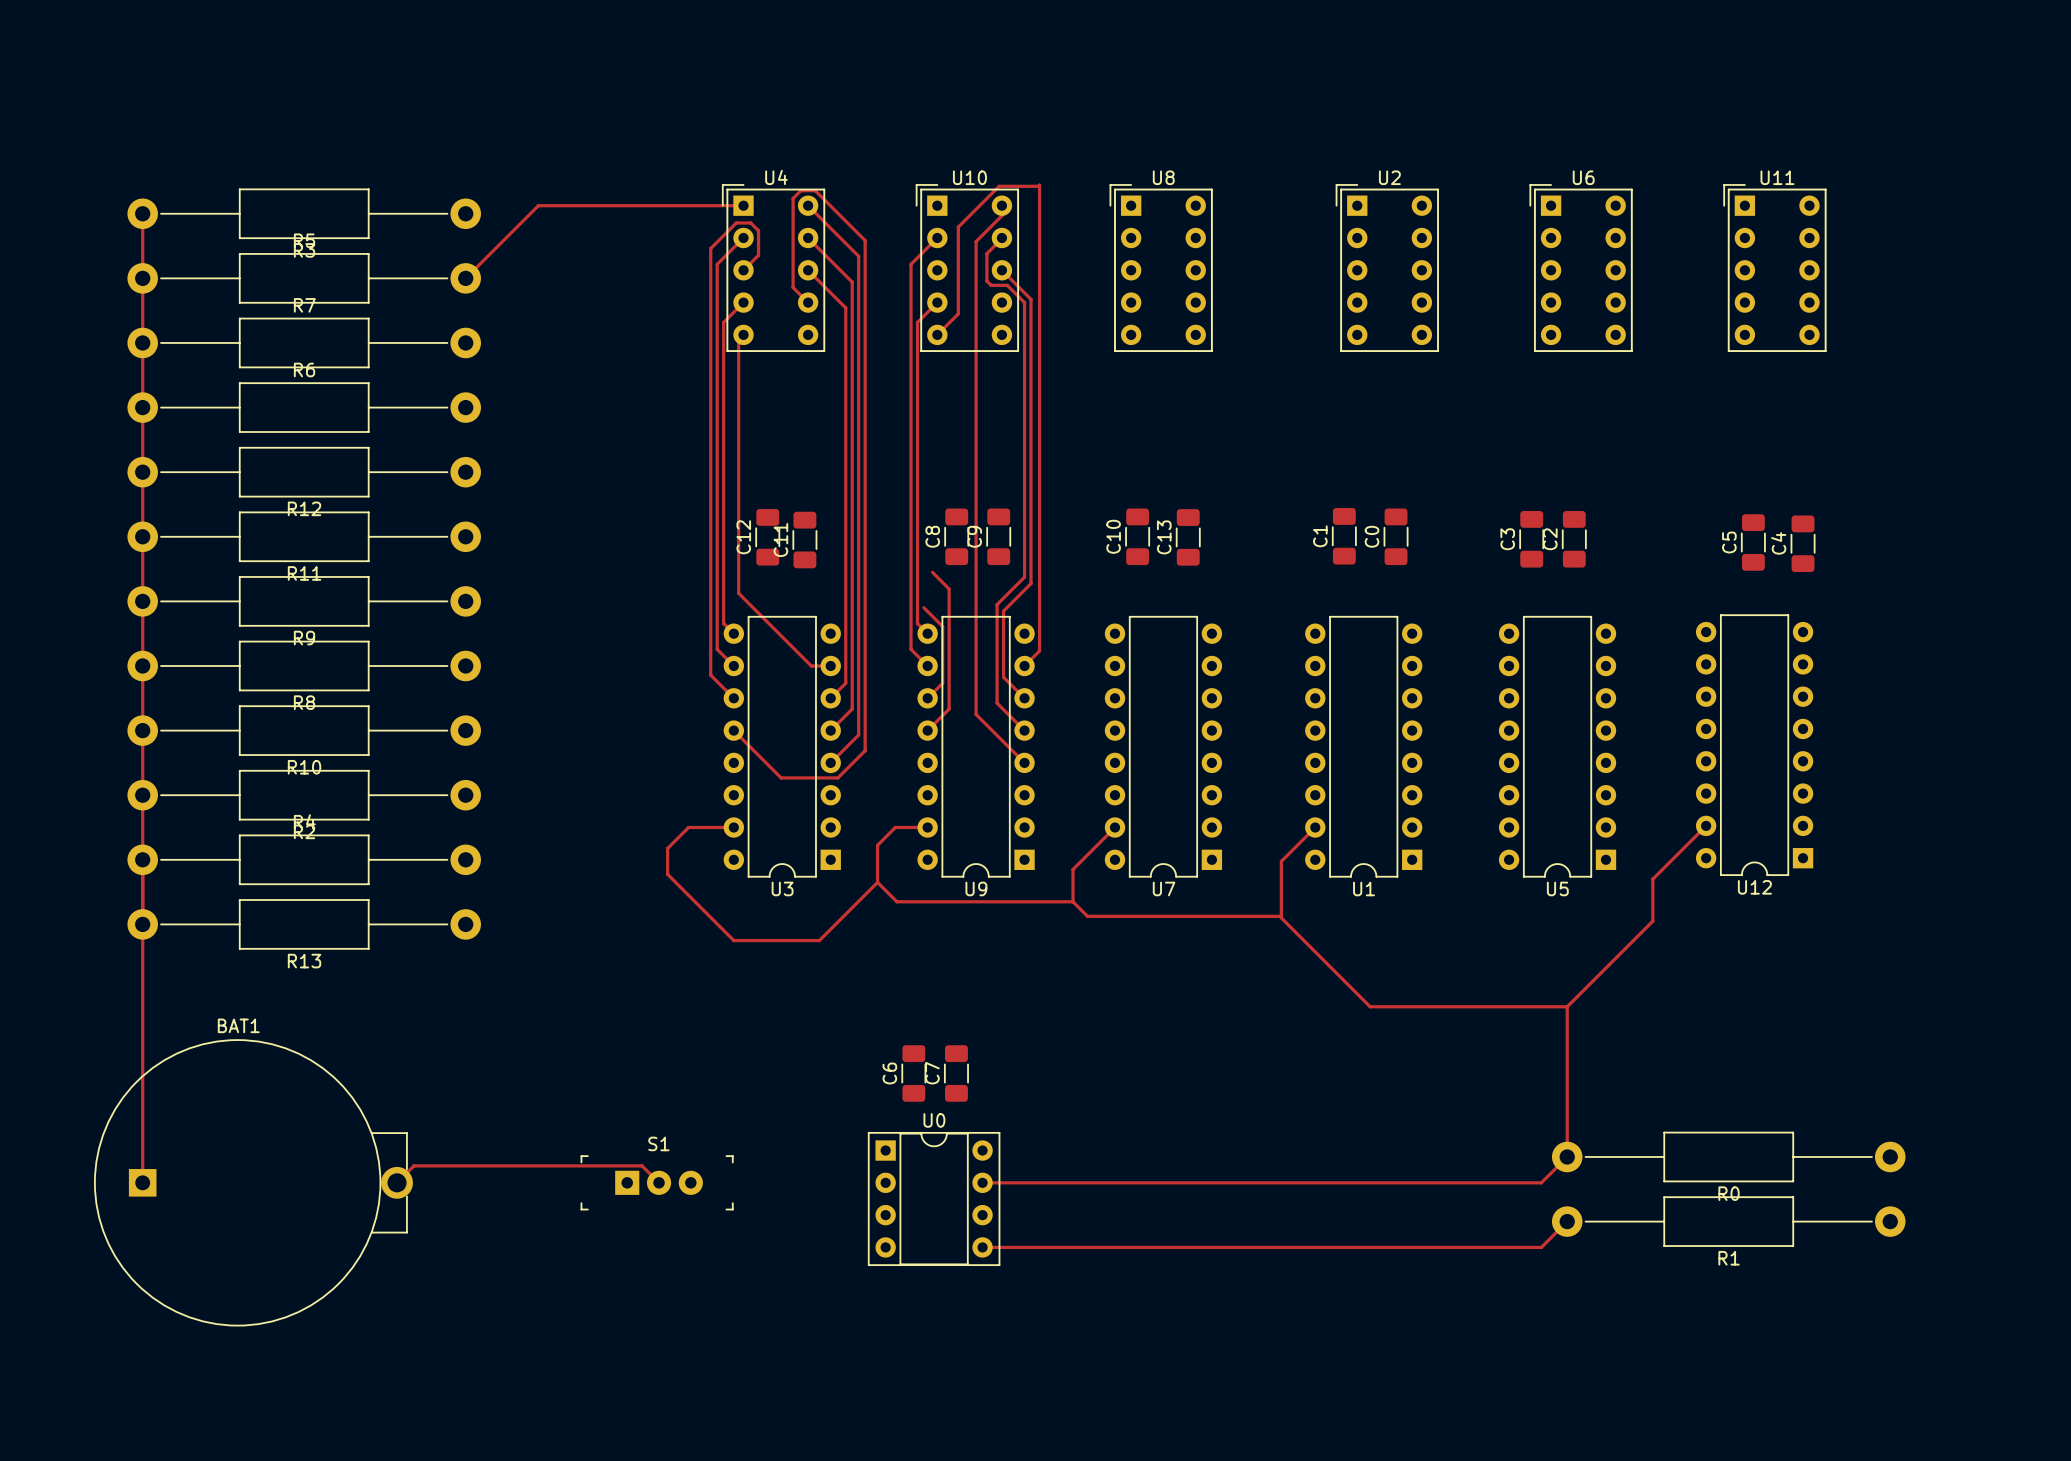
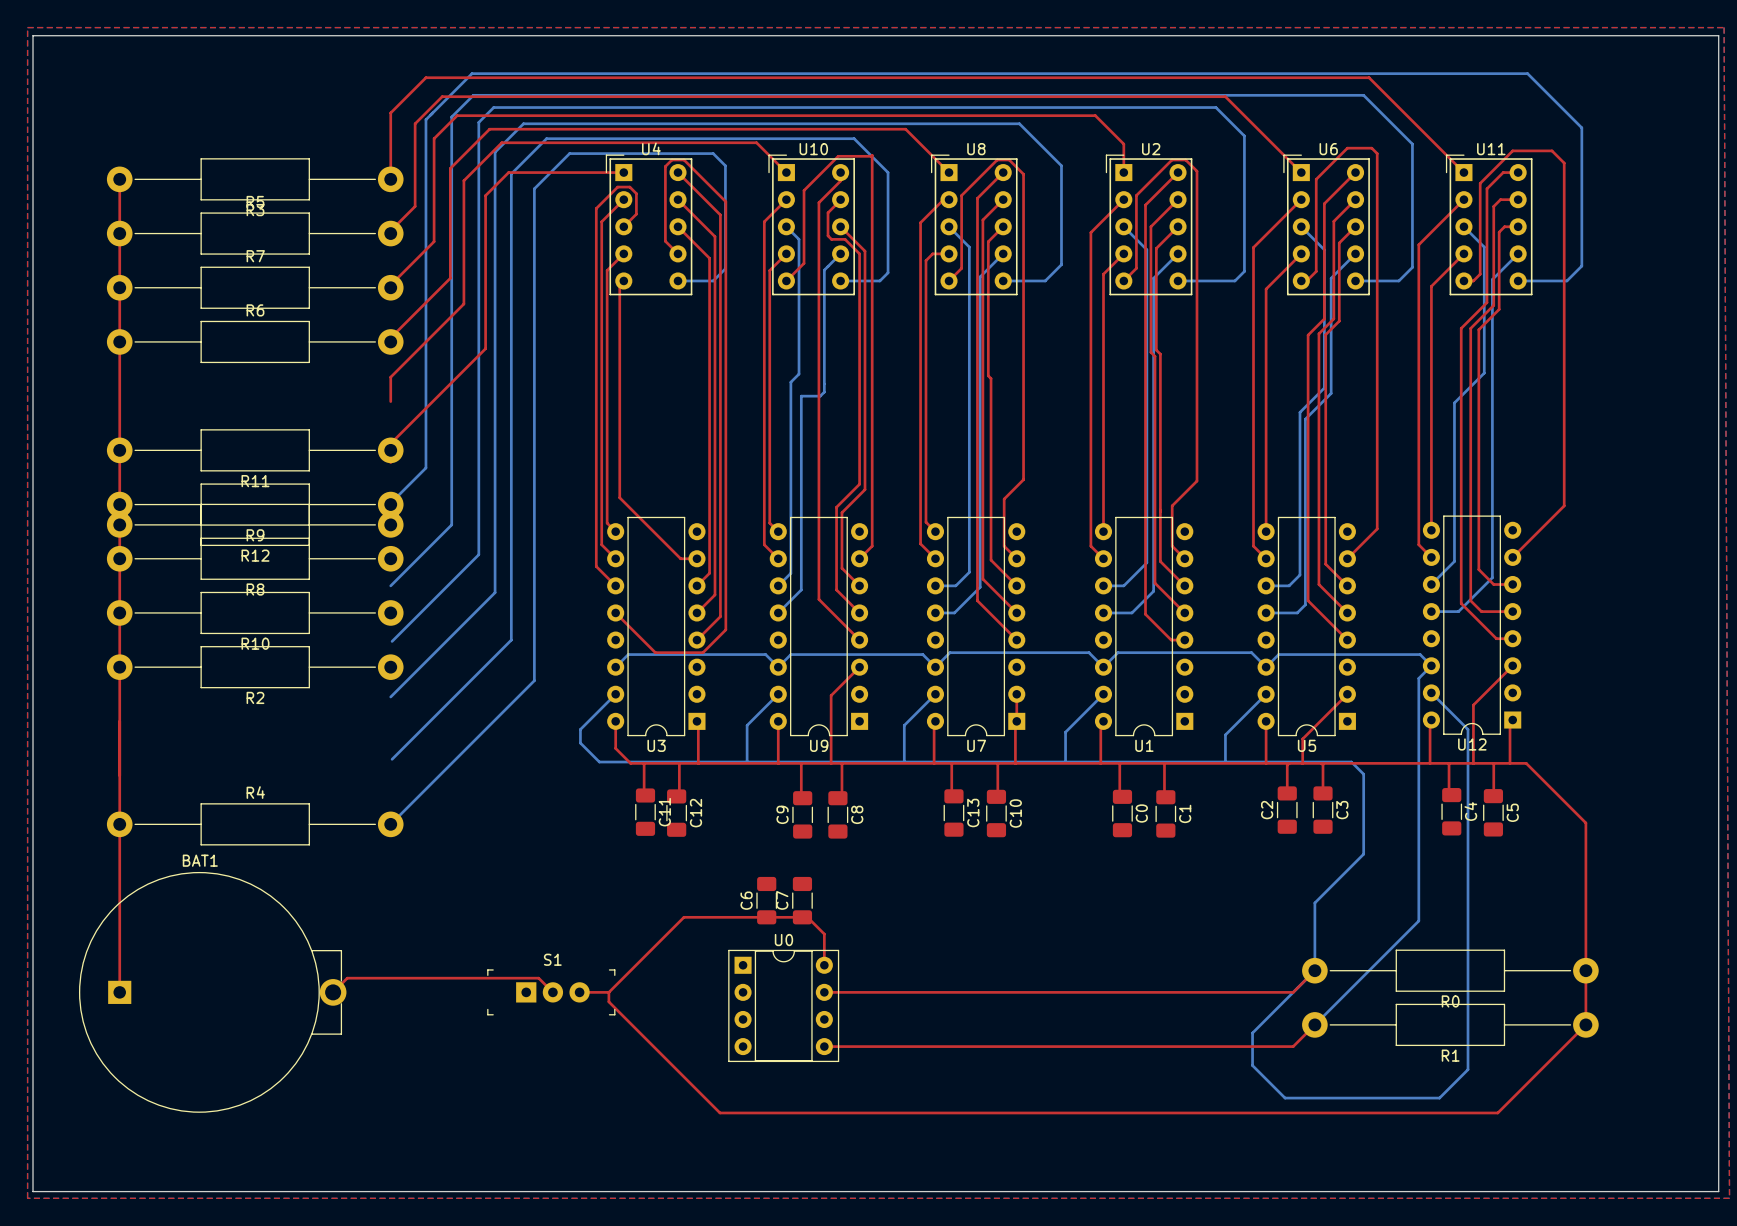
top zone outline: none -> (27, 27) (27, 1198) (1729, 1198) (1724, 27) (27, 27)
board edge: none -> (33, 35) (1718, 35) (1718, 1191) (33, 1191) (33, 35)
top track: (606, 205) (538, 205) (465, 278) -> (508, 172) (485, 195) (485, 348) (390, 443) (390, 462)
top track: none -> (786, 172) (756, 142) (501, 142) (463, 180) (463, 304) (390, 377) (390, 401)
top track: none -> (949, 172) (905, 129) (489, 129) (450, 168) (450, 278) (389, 339)
top track: none -> (1003, 172) (977, 198) (977, 600) (1016, 640)
top track: none -> (1123, 172) (1123, 144) (1095, 115) (457, 115) (434, 138) (434, 241) (390, 285)
top track: none -> (1178, 172) (1145, 205) (1145, 614) (1171, 640) (1184, 640)
top track: none -> (1301, 172) (1225, 96) (442, 96) (415, 123) (415, 206) (390, 230)
top track: none -> (1355, 172) (1324, 203) (1324, 318) (1308, 335) (1308, 600) (1347, 640)
top track: none -> (1463, 172) (1369, 77) (425, 77) (390, 112) (390, 177)
top track: none -> (1518, 172) (1503, 172) (1486, 188) (1486, 302) (1461, 328) (1461, 603) (1496, 638) (1512, 638)
top track: none -> (949, 199) (943, 199) (920, 222) (920, 543) (935, 558)
top track: none -> (1003, 199) (982, 220) (982, 579) (1016, 612)
top track: none -> (1123, 199) (1090, 232) (1090, 546) (1103, 558)
top track: none -> (1178, 199) (1150, 226) (1150, 352) (1154, 356) (1154, 583) (1184, 612)
top track: none -> (1301, 199) (1253, 247) (1253, 546) (1266, 558)
top track: none -> (1355, 199) (1333, 221) (1333, 318) (1318, 333) (1318, 584) (1347, 612)
top track: none -> (1463, 199) (1418, 244) (1418, 544) (1431, 557)
top track: none -> (1518, 199) (1500, 199) (1493, 206) (1493, 305) (1470, 328) (1470, 600) (1481, 611) (1512, 611)
U2 position: (1387, 268) -> (1149, 224)
bottom track: none -> (786, 226) (799, 239) (799, 374) (790, 382) (790, 573) (778, 585)
bottom track: none -> (949, 226) (969, 247) (969, 572) (955, 585) (935, 585)
top track: none -> (1003, 226) (988, 241) (988, 375) (991, 378) (991, 560) (1016, 585)
bottom track: none -> (1123, 226) (1146, 249) (1146, 562) (1123, 585) (1103, 585)
top track: none -> (1178, 226) (1156, 248) (1156, 350) (1160, 354) (1160, 561) (1184, 585)
bottom track: none -> (1301, 226) (1324, 249) (1324, 388) (1299, 412) (1299, 575) (1289, 585) (1266, 585)
top track: none -> (1355, 226) (1339, 243) (1339, 321) (1325, 334) (1325, 564) (1347, 585)
bottom track: none -> (1463, 226) (1484, 247) (1484, 373) (1454, 402) (1454, 561) (1431, 584)
top track: none -> (1518, 226) (1504, 226) (1499, 232) (1499, 309) (1478, 329) (1478, 569) (1493, 584) (1512, 584)
bottom track: none -> (840, 253) (824, 270) (824, 392) (820, 396) (801, 396) (801, 589) (778, 612)
top track: none -> (949, 253) (932, 253) (925, 260) (925, 522) (935, 531)
bottom track: none -> (1003, 253) (980, 276) (980, 587) (954, 612) (935, 612)
top track: none -> (1123, 253) (1103, 274) (1103, 531)
bottom track: none -> (1178, 253) (1153, 278) (1153, 591) (1131, 612) (1103, 612)
top track: none -> (1301, 253) (1266, 289) (1266, 531)
bottom track: none -> (1355, 253) (1331, 278) (1331, 393) (1305, 419) (1305, 604) (1297, 612) (1266, 612)
top track: none -> (1463, 253) (1431, 286) (1431, 530)
bottom track: none -> (1518, 253) (1492, 279) (1492, 577) (1458, 611) (1431, 611)
bottom track: none -> (678, 280) (713, 280) (725, 268) (725, 165) (713, 153) (569, 153) (534, 188) (534, 680) (390, 824)
bottom track: none -> (840, 280) (879, 280) (888, 272) (888, 172) (854, 138) (546, 138) (511, 173) (511, 640) (392, 759)
top track: none -> (949, 280) (961, 268) (961, 195) (997, 159) (1009, 159) (1023, 174) (1023, 479) (1004, 499) (1004, 546) (1016, 558)
bottom track: none -> (1003, 280) (1045, 280) (1061, 264) (1061, 165) (1019, 123) (523, 123) (495, 152) (495, 592) (390, 696)
top track: none -> (1123, 280) (1136, 268) (1136, 195) (1171, 159) (1185, 159) (1196, 171) (1196, 481) (1172, 505) (1172, 546) (1184, 558)
bottom track: none -> (1178, 280) (1234, 280) (1244, 271) (1244, 135) (1215, 107) (493, 107) (478, 122) (478, 554) (392, 641)
top track: none -> (1301, 280) (1306, 280) (1316, 271) (1316, 179) (1347, 148) (1371, 148) (1377, 153) (1377, 528) (1347, 558)
bottom track: none -> (1355, 280) (1398, 280) (1412, 267) (1412, 144) (1363, 95) (473, 95) (451, 117) (451, 524) (390, 585)
top track: none -> (1463, 280) (1473, 280) (1480, 274) (1480, 183) (1512, 150) (1552, 150) (1564, 163) (1564, 505) (1512, 557)
bottom track: none -> (1518, 280) (1566, 280) (1581, 266) (1581, 127) (1527, 73) (472, 73) (425, 119) (425, 467) (390, 503) (390, 524)
R12 position: (304, 472) -> (255, 524)
C8 name position: C8 (932, 536) -> C8 (857, 814)
C8 position: (956, 536) -> (837, 814)
C9 position: (998, 536) -> (802, 814)
C10 name position: C10 (1113, 536) -> C10 (1015, 813)
C10 position: (1137, 536) -> (996, 813)
C1 name position: C1 (1320, 536) -> C1 (1185, 813)
C1 position: (1344, 536) -> (1165, 813)
C0 name position: C0 (1372, 536) -> C0 (1141, 813)
C0 position: (1396, 536) -> (1122, 813)
C12 name position: C12 (743, 537) -> C12 (695, 813)
C12 position: (767, 537) -> (676, 813)
C13 name position: C13 (1164, 537) -> C13 (973, 812)
C13 position: (1188, 537) -> (953, 812)
C3 name position: C3 (1507, 539) -> C3 (1342, 810)
C3 position: (1531, 539) -> (1323, 810)
C2 position: (1574, 539) -> (1287, 810)
C11 name position: C11 (780, 540) -> C11 (664, 812)
C11 position: (804, 540) -> (645, 812)
C5 name position: C5 (1729, 542) -> C5 (1512, 812)
C5 position: (1753, 542) -> (1493, 812)
C4 name position: C4 (1778, 543) -> C4 (1470, 811)
C4 position: (1803, 543) -> (1451, 811)
top track: (932, 572) (949, 588) (949, 709) (927, 730) -> none
top track: (923, 607) (942, 626) (942, 683) (927, 698) -> none
top track: none -> (1512, 665) (1473, 705) (1473, 763)
bottom track: none -> (615, 667) (628, 654) (765, 654) (778, 667) (790, 654) (922, 654) (935, 667) (949, 652) (1088, 652) (1103, 667) (1117, 652) (1251, 652) (1266, 667) (1278, 654) (1420, 654) (1431, 665) (1418, 678) (1418, 920) (1314, 1024)
top track: none -> (859, 667) (831, 695) (831, 763)
top track: (1706, 825) (1652, 879) (1652, 921) (1567, 1006) -> none
bottom track: none -> (1431, 692) (1468, 729) (1468, 1069) (1439, 1098) (1285, 1098) (1252, 1065) (1252, 1033) (1314, 970) (1314, 902) (1363, 854) (1363, 774) (1351, 762) (599, 762) (580, 743) (580, 729) (615, 694)
top track: (733, 827) (688, 827) (667, 848) (667, 874) (733, 940) (819, 940) (877, 882) -> none
top track: (927, 827) (895, 827) (877, 845) (877, 882) -> none
bottom track: none -> (778, 694) (747, 725) (747, 762)
top track: (1115, 827) (1073, 869) (1073, 901) -> none
bottom track: none -> (935, 694) (904, 725) (904, 762)
top track: none -> (1016, 694) (1015, 763)
top track: (1315, 827) (1281, 861) (1281, 917) (1370, 1006) (1567, 1006) -> none
bottom track: none -> (1103, 694) (1065, 732) (1065, 762)
bottom track: none -> (1266, 694) (1225, 734) (1225, 762)
top track: none -> (1347, 694) (1302, 738) (1302, 763)
top track: none -> (1431, 720) (1430, 763)
top track: none -> (1512, 720) (1510, 722) (1510, 763)
R4 position: (304, 859) -> (255, 824)
top track: none -> (615, 721) (615, 748) (630, 763) (1526, 763) (1585, 823) (1585, 1024) (1497, 1112) (720, 1112) (608, 1001) (608, 992)
top track: none -> (701, 721) (696, 721) (698, 763)
top track: none -> (778, 721) (778, 763)
top track: none -> (935, 721) (934, 763)
top track: none -> (1103, 721) (1100, 724) (1100, 763)
top track: none -> (1266, 721) (1266, 763)
top track: (877, 882) (896, 901) (1073, 901) -> none
top track: (1073, 901) (1087, 916) (1281, 916) -> none
top track: none -> (644, 763) (645, 795)
top track: none -> (679, 763) (679, 793) (676, 796)
top track: none -> (801, 763) (802, 798)
top track: none -> (841, 763) (841, 794) (837, 798)
top track: none -> (951, 763) (951, 794) (953, 796)
top track: none -> (997, 763) (996, 796)
top track: none -> (1119, 763) (1119, 794) (1122, 796)
top track: none -> (1164, 763) (1165, 797)
top track: none -> (1289, 763) (1287, 765) (1287, 793)
top track: none -> (1321, 763) (1323, 793)
top track: none -> (1449, 763) (1449, 792) (1451, 795)
top track: none -> (1493, 763) (1493, 796)
R13: (304, 924) -> none
top track: (1567, 1006) (1567, 1156) -> none
top track: none -> (824, 965) (824, 934) (807, 917) (683, 917) (608, 992)
top track: none -> (580, 992) (608, 992)

